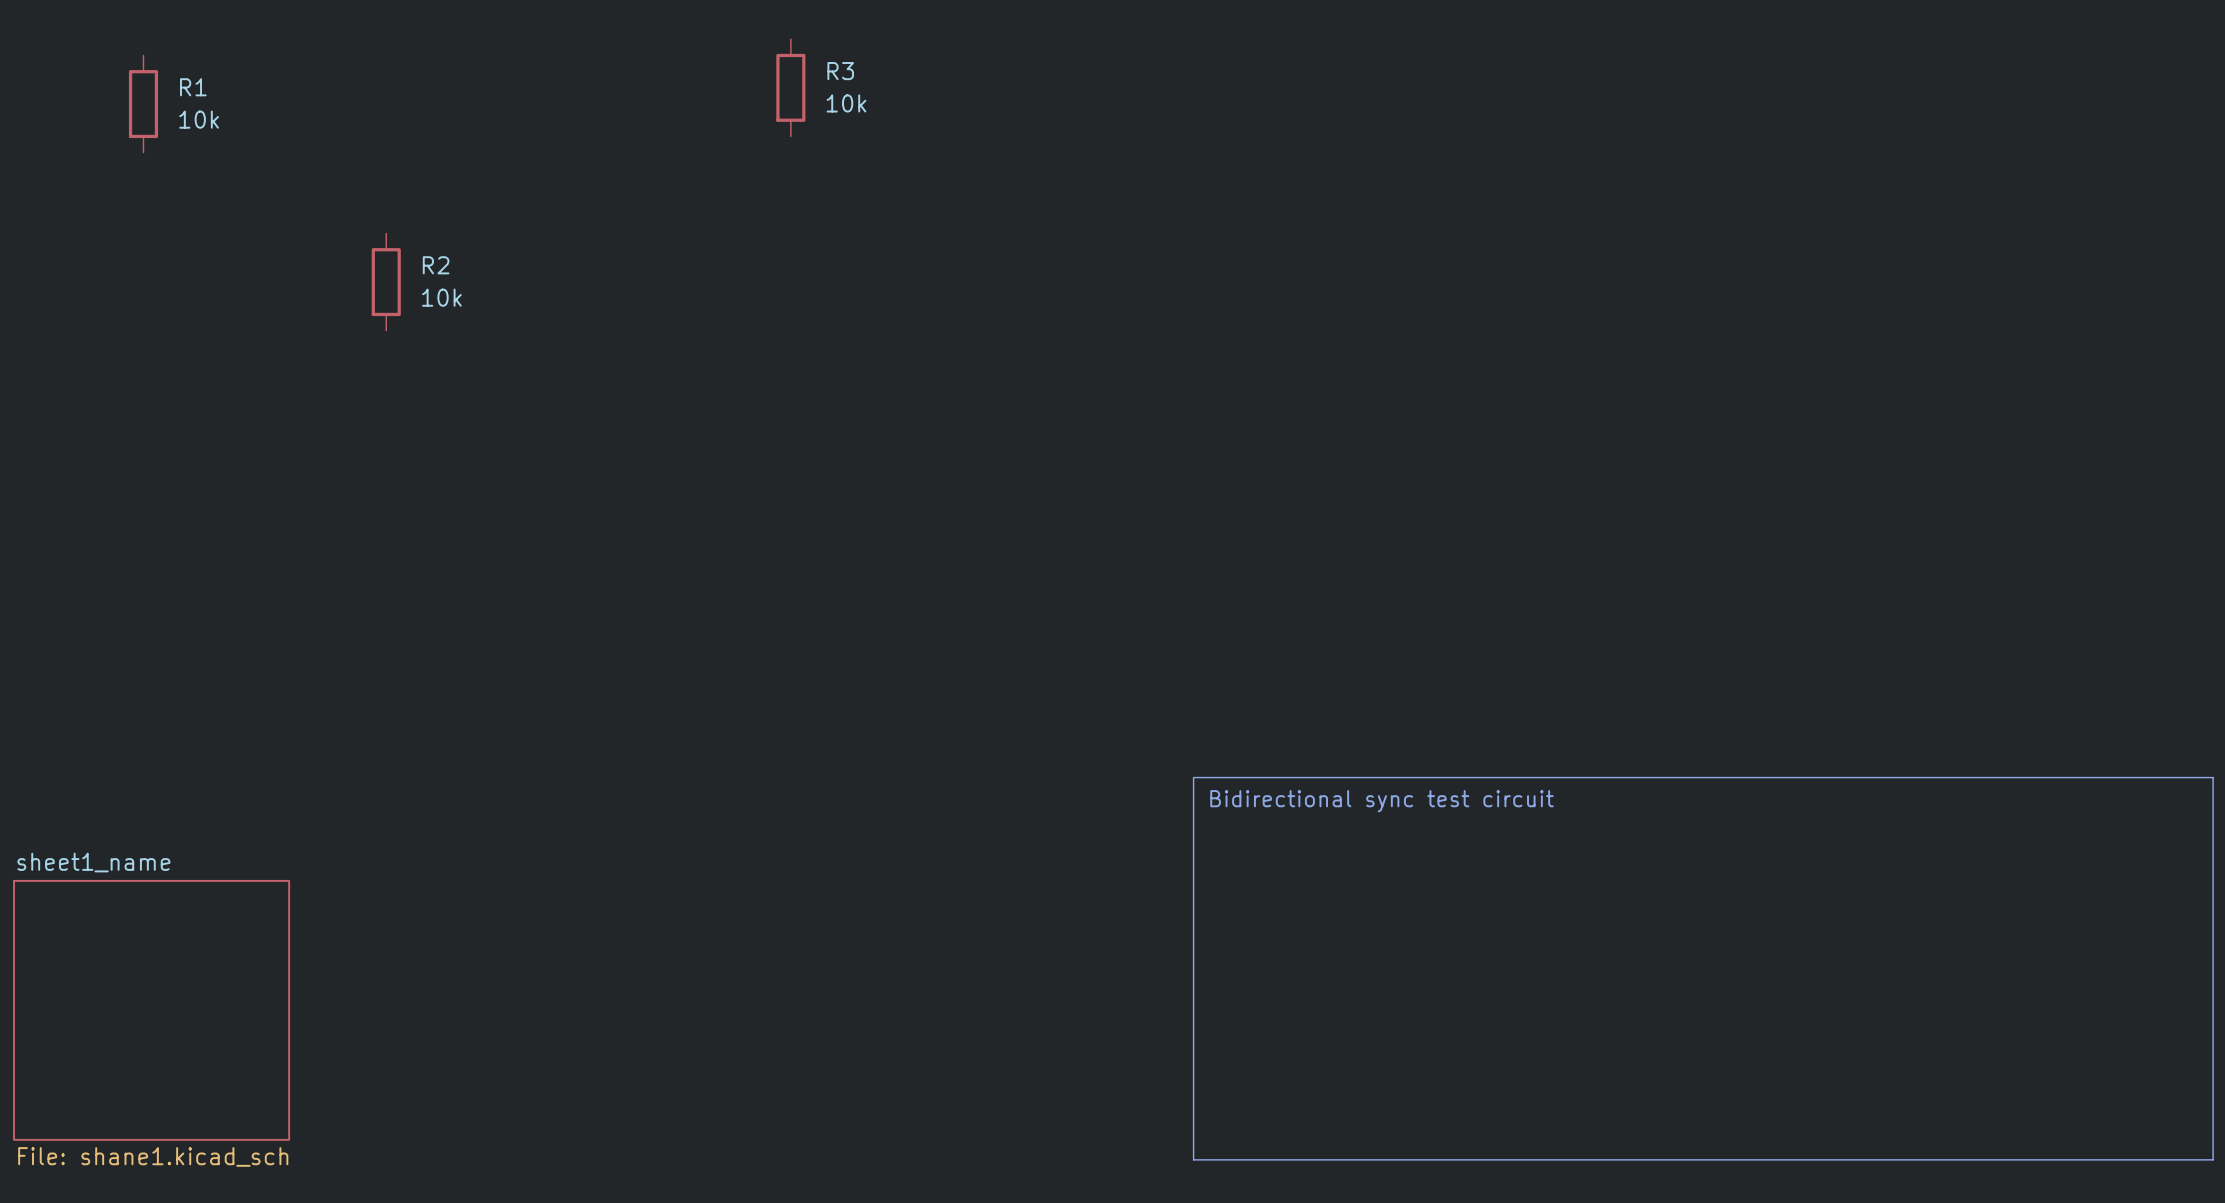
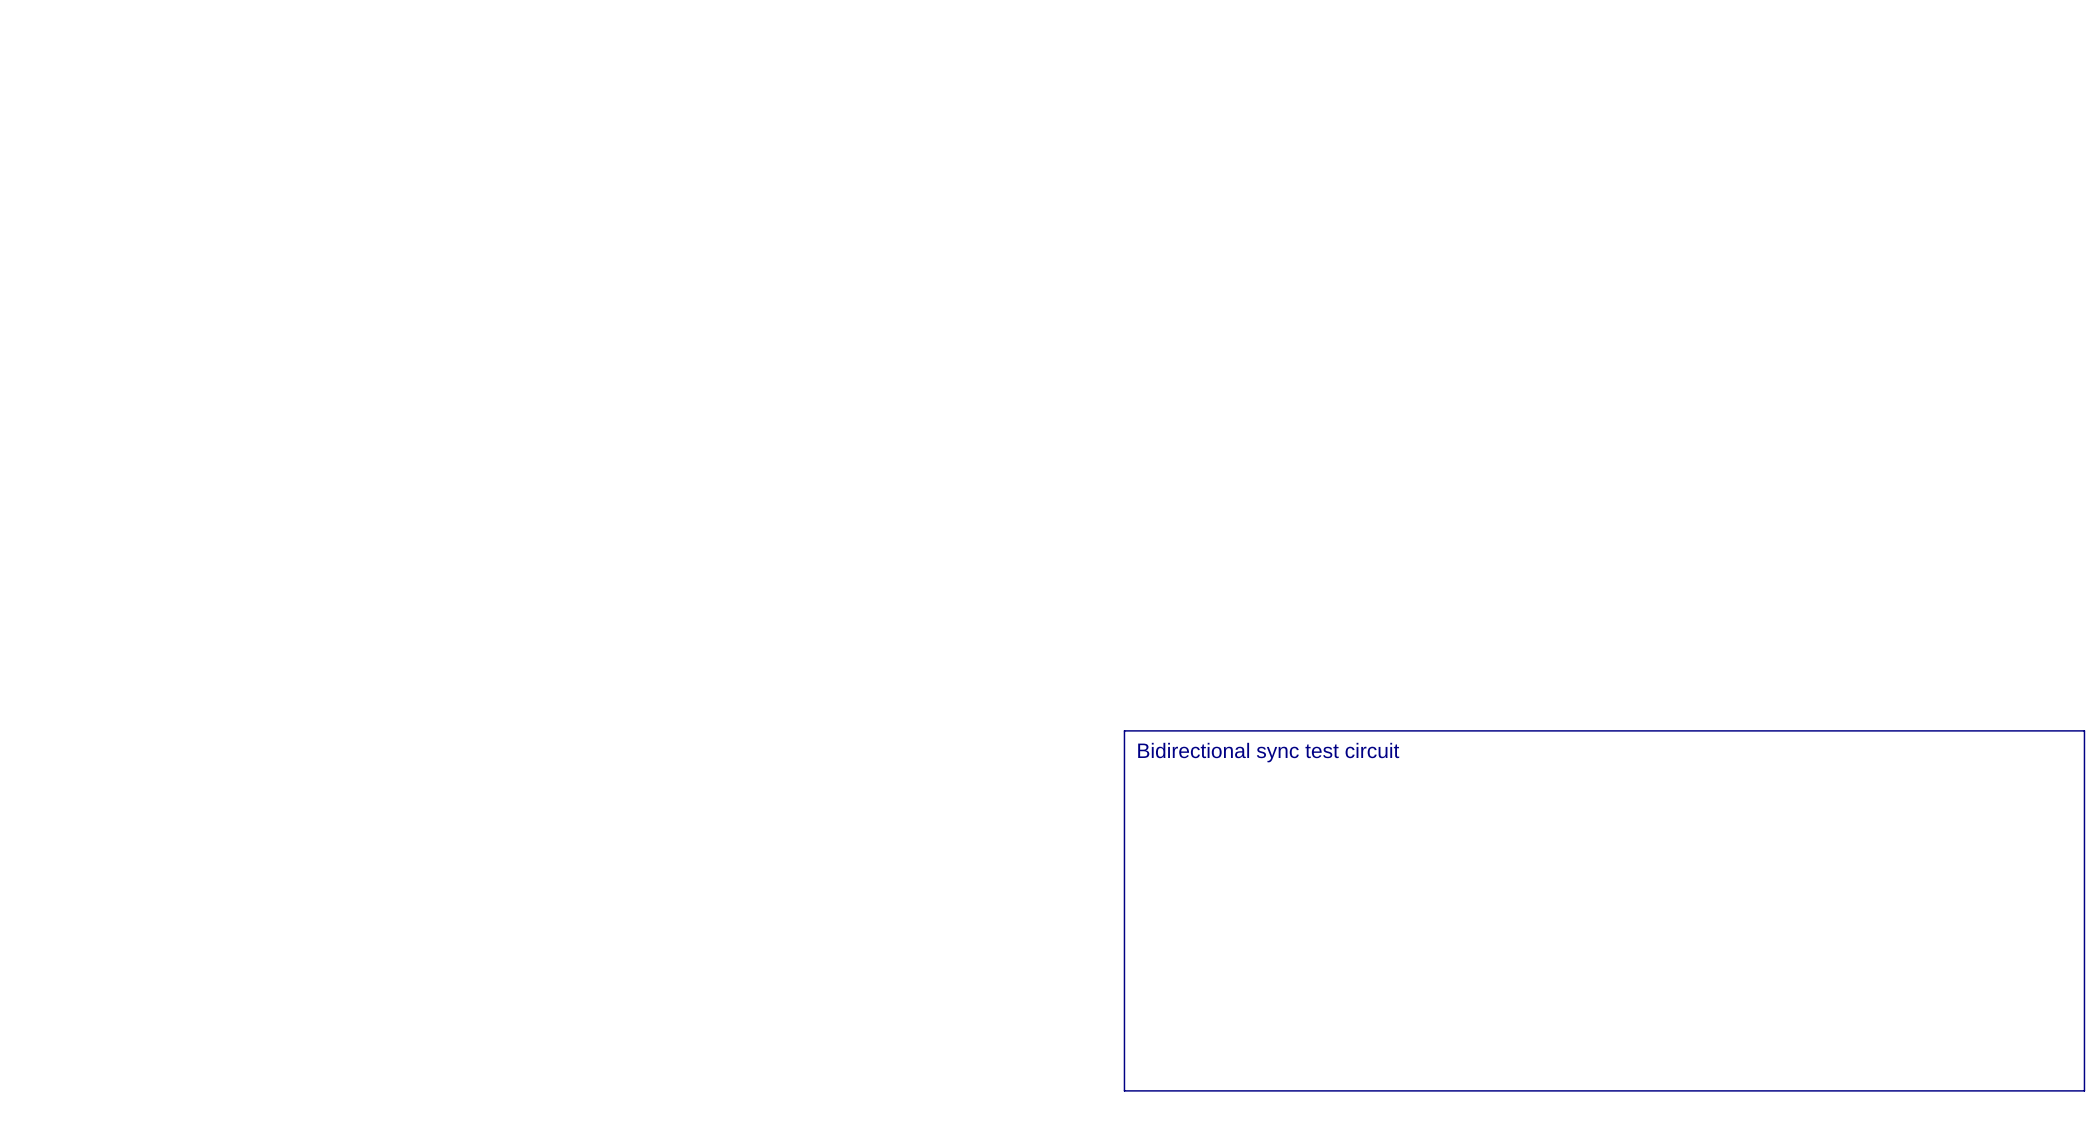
R3: 10k (790, 87) -> none
R1: 10k (143, 104) -> none
R2: 10k (386, 282) -> none
sheet sheet1_name: File: shane1.kicad_sch (151, 1010) -> none

